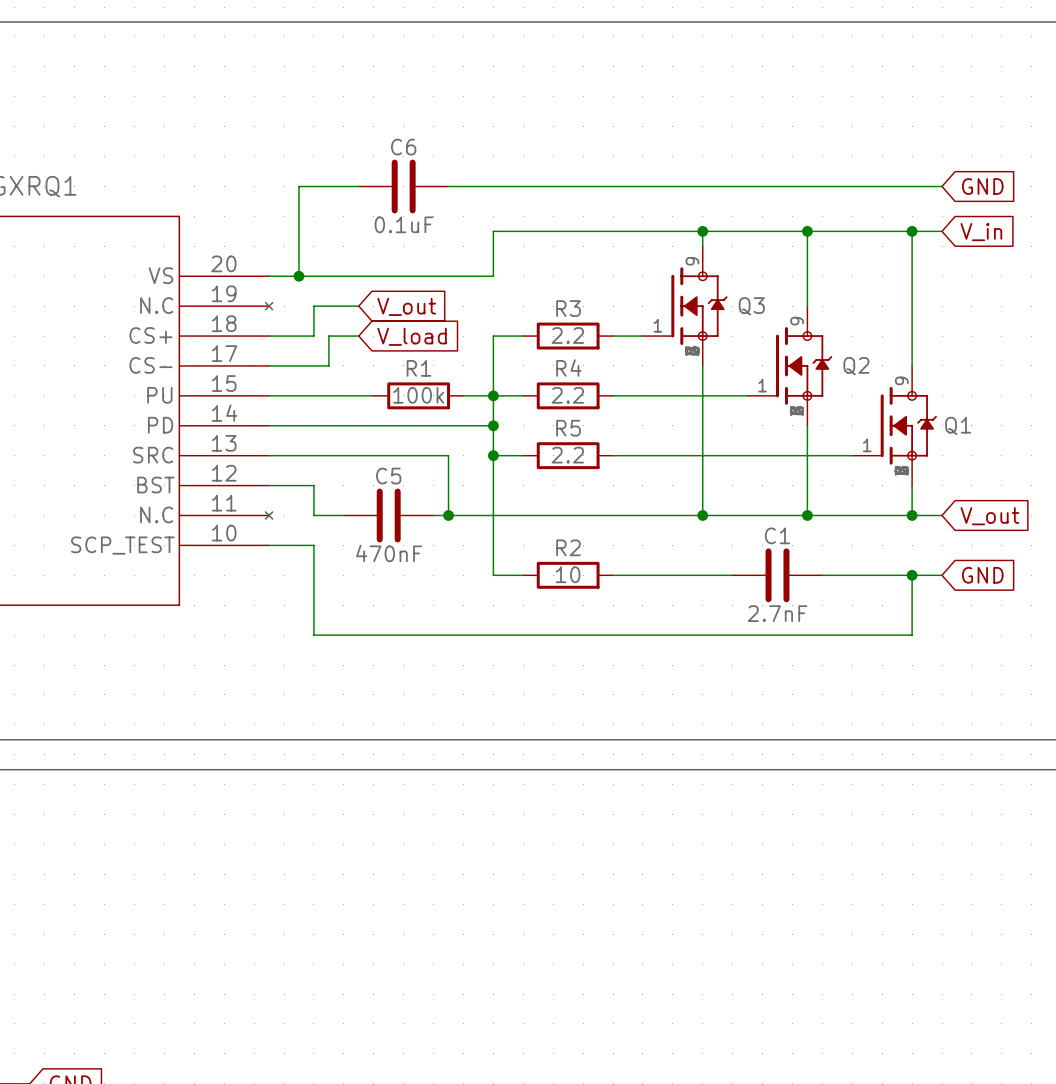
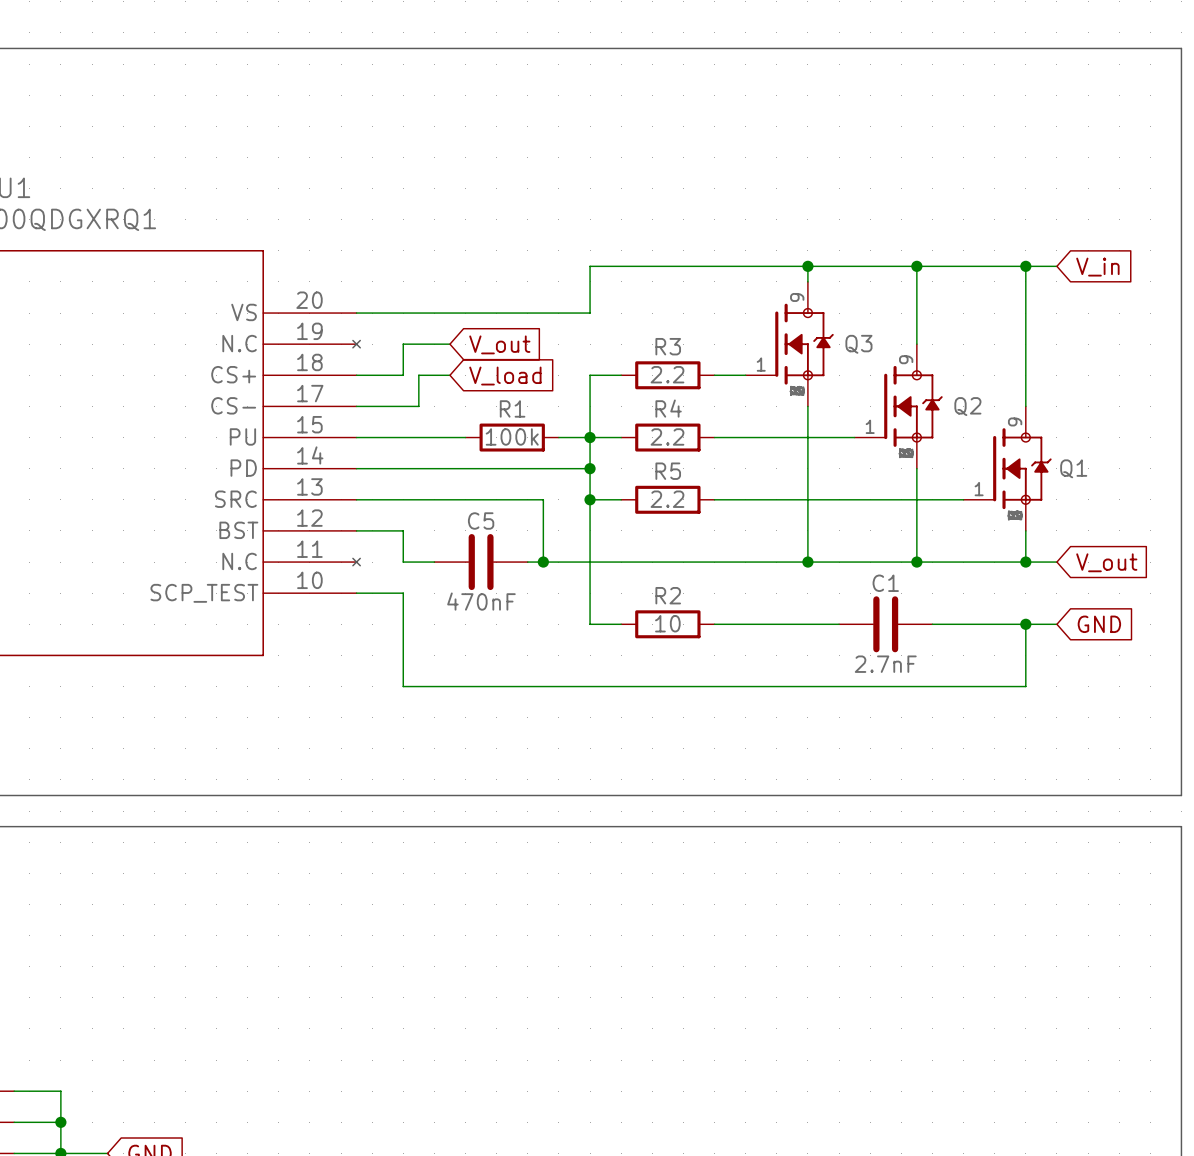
wire: (358, 186) (298, 186) (298, 276) -> none
C6: 0.1uF (403, 186) -> none
wire: (448, 186) (942, 186) -> none
global label: GND (982, 186) -> none
junction: (298, 276) -> none

